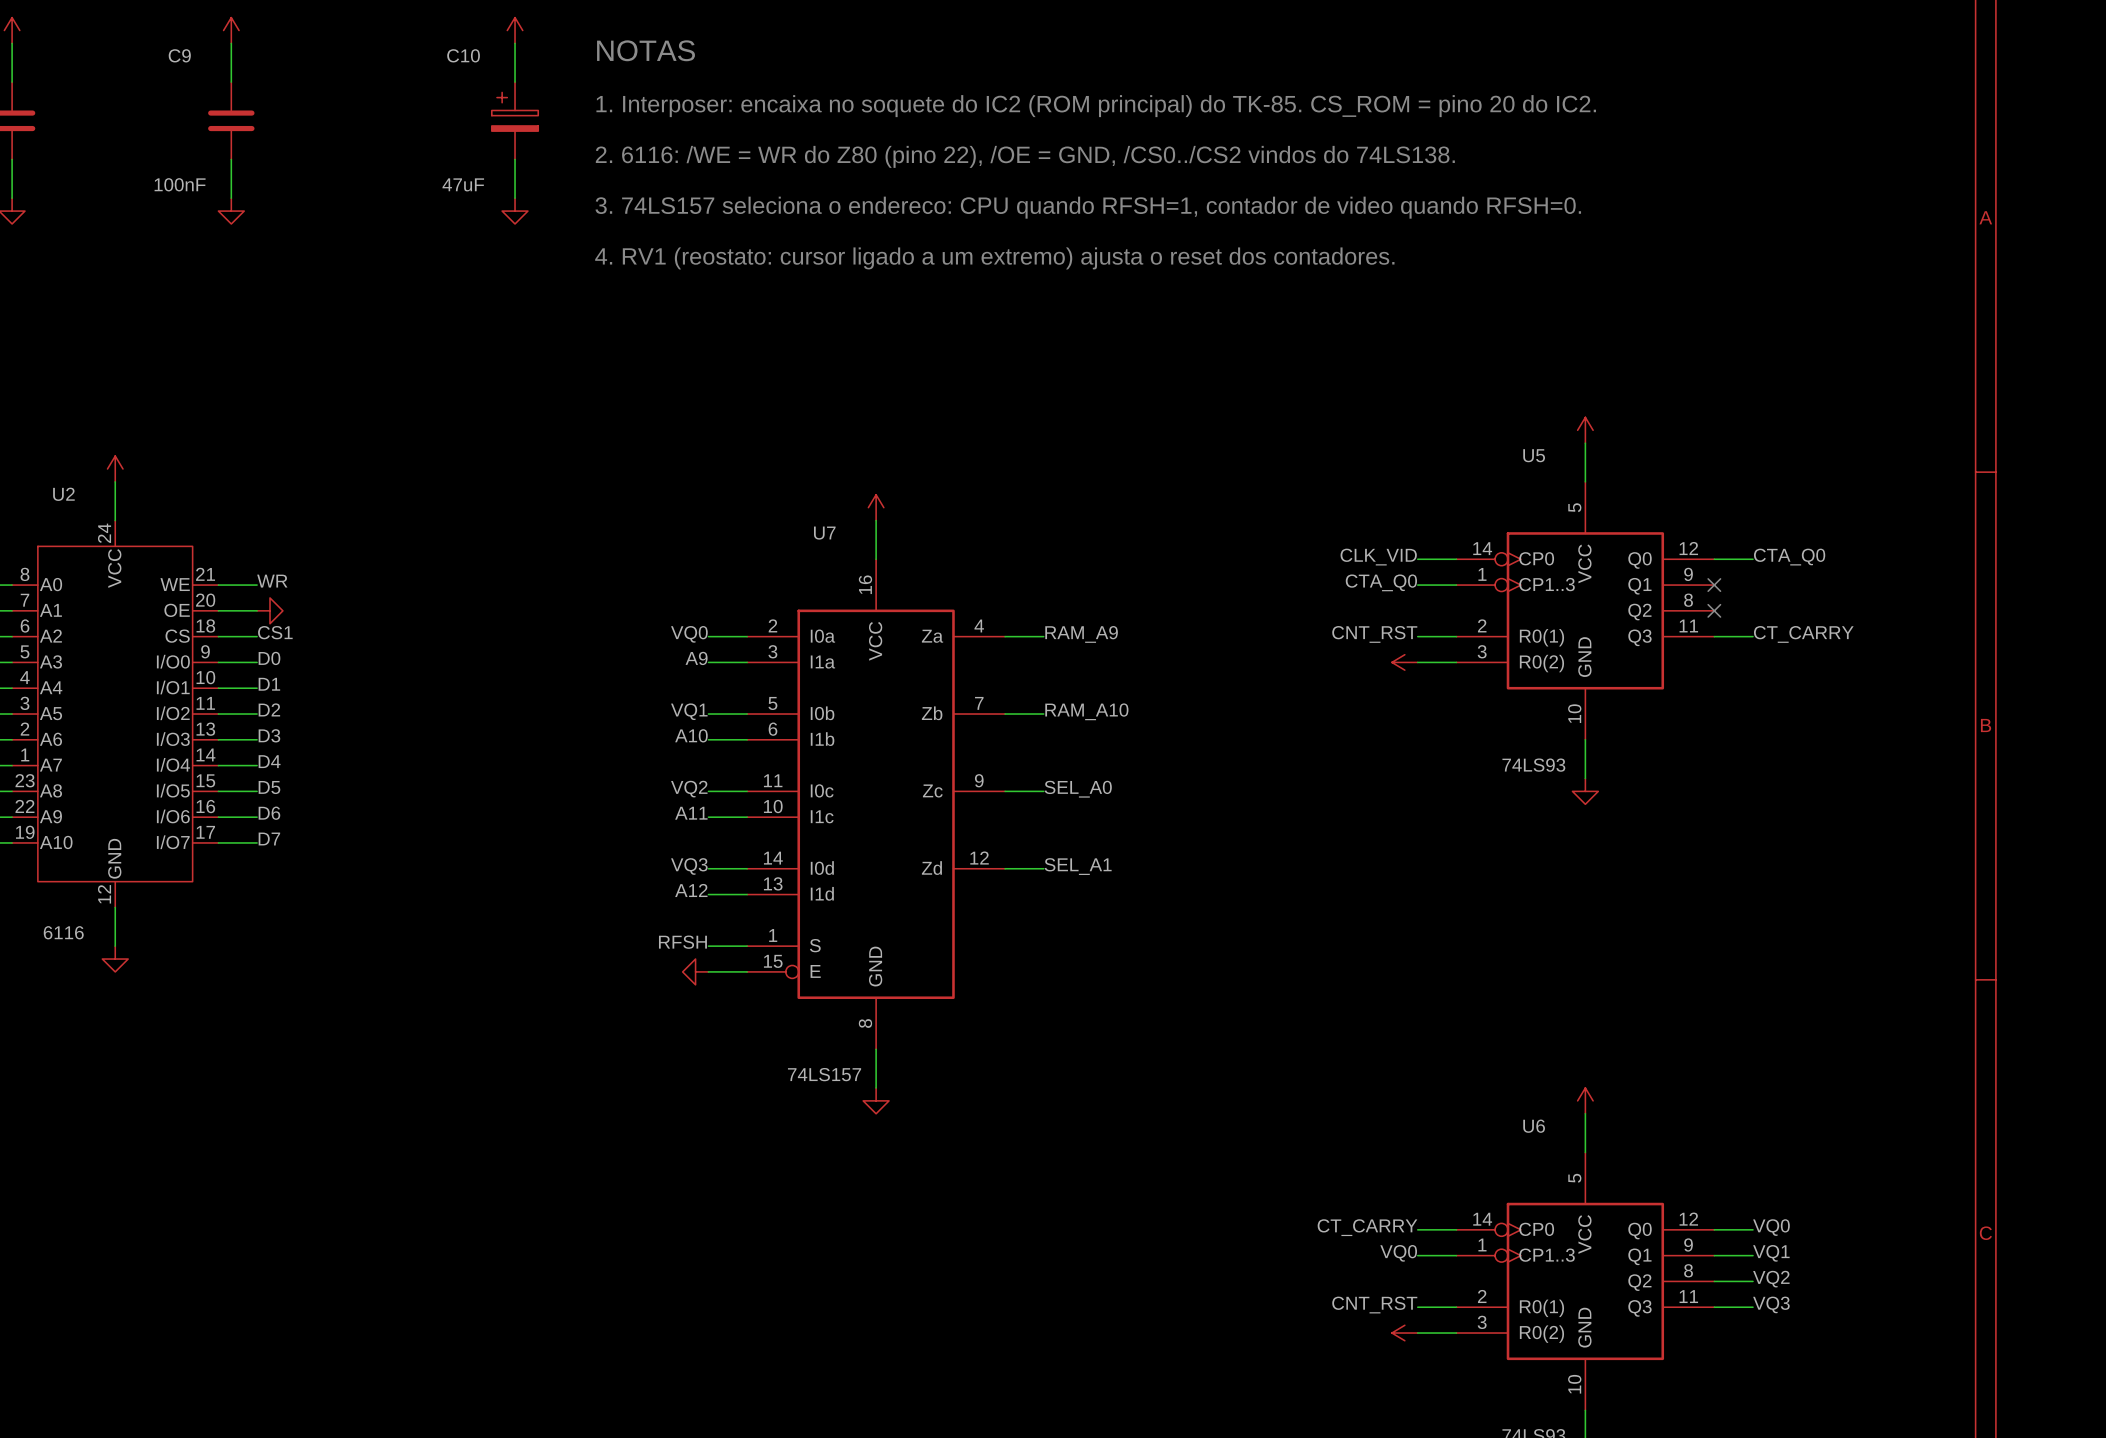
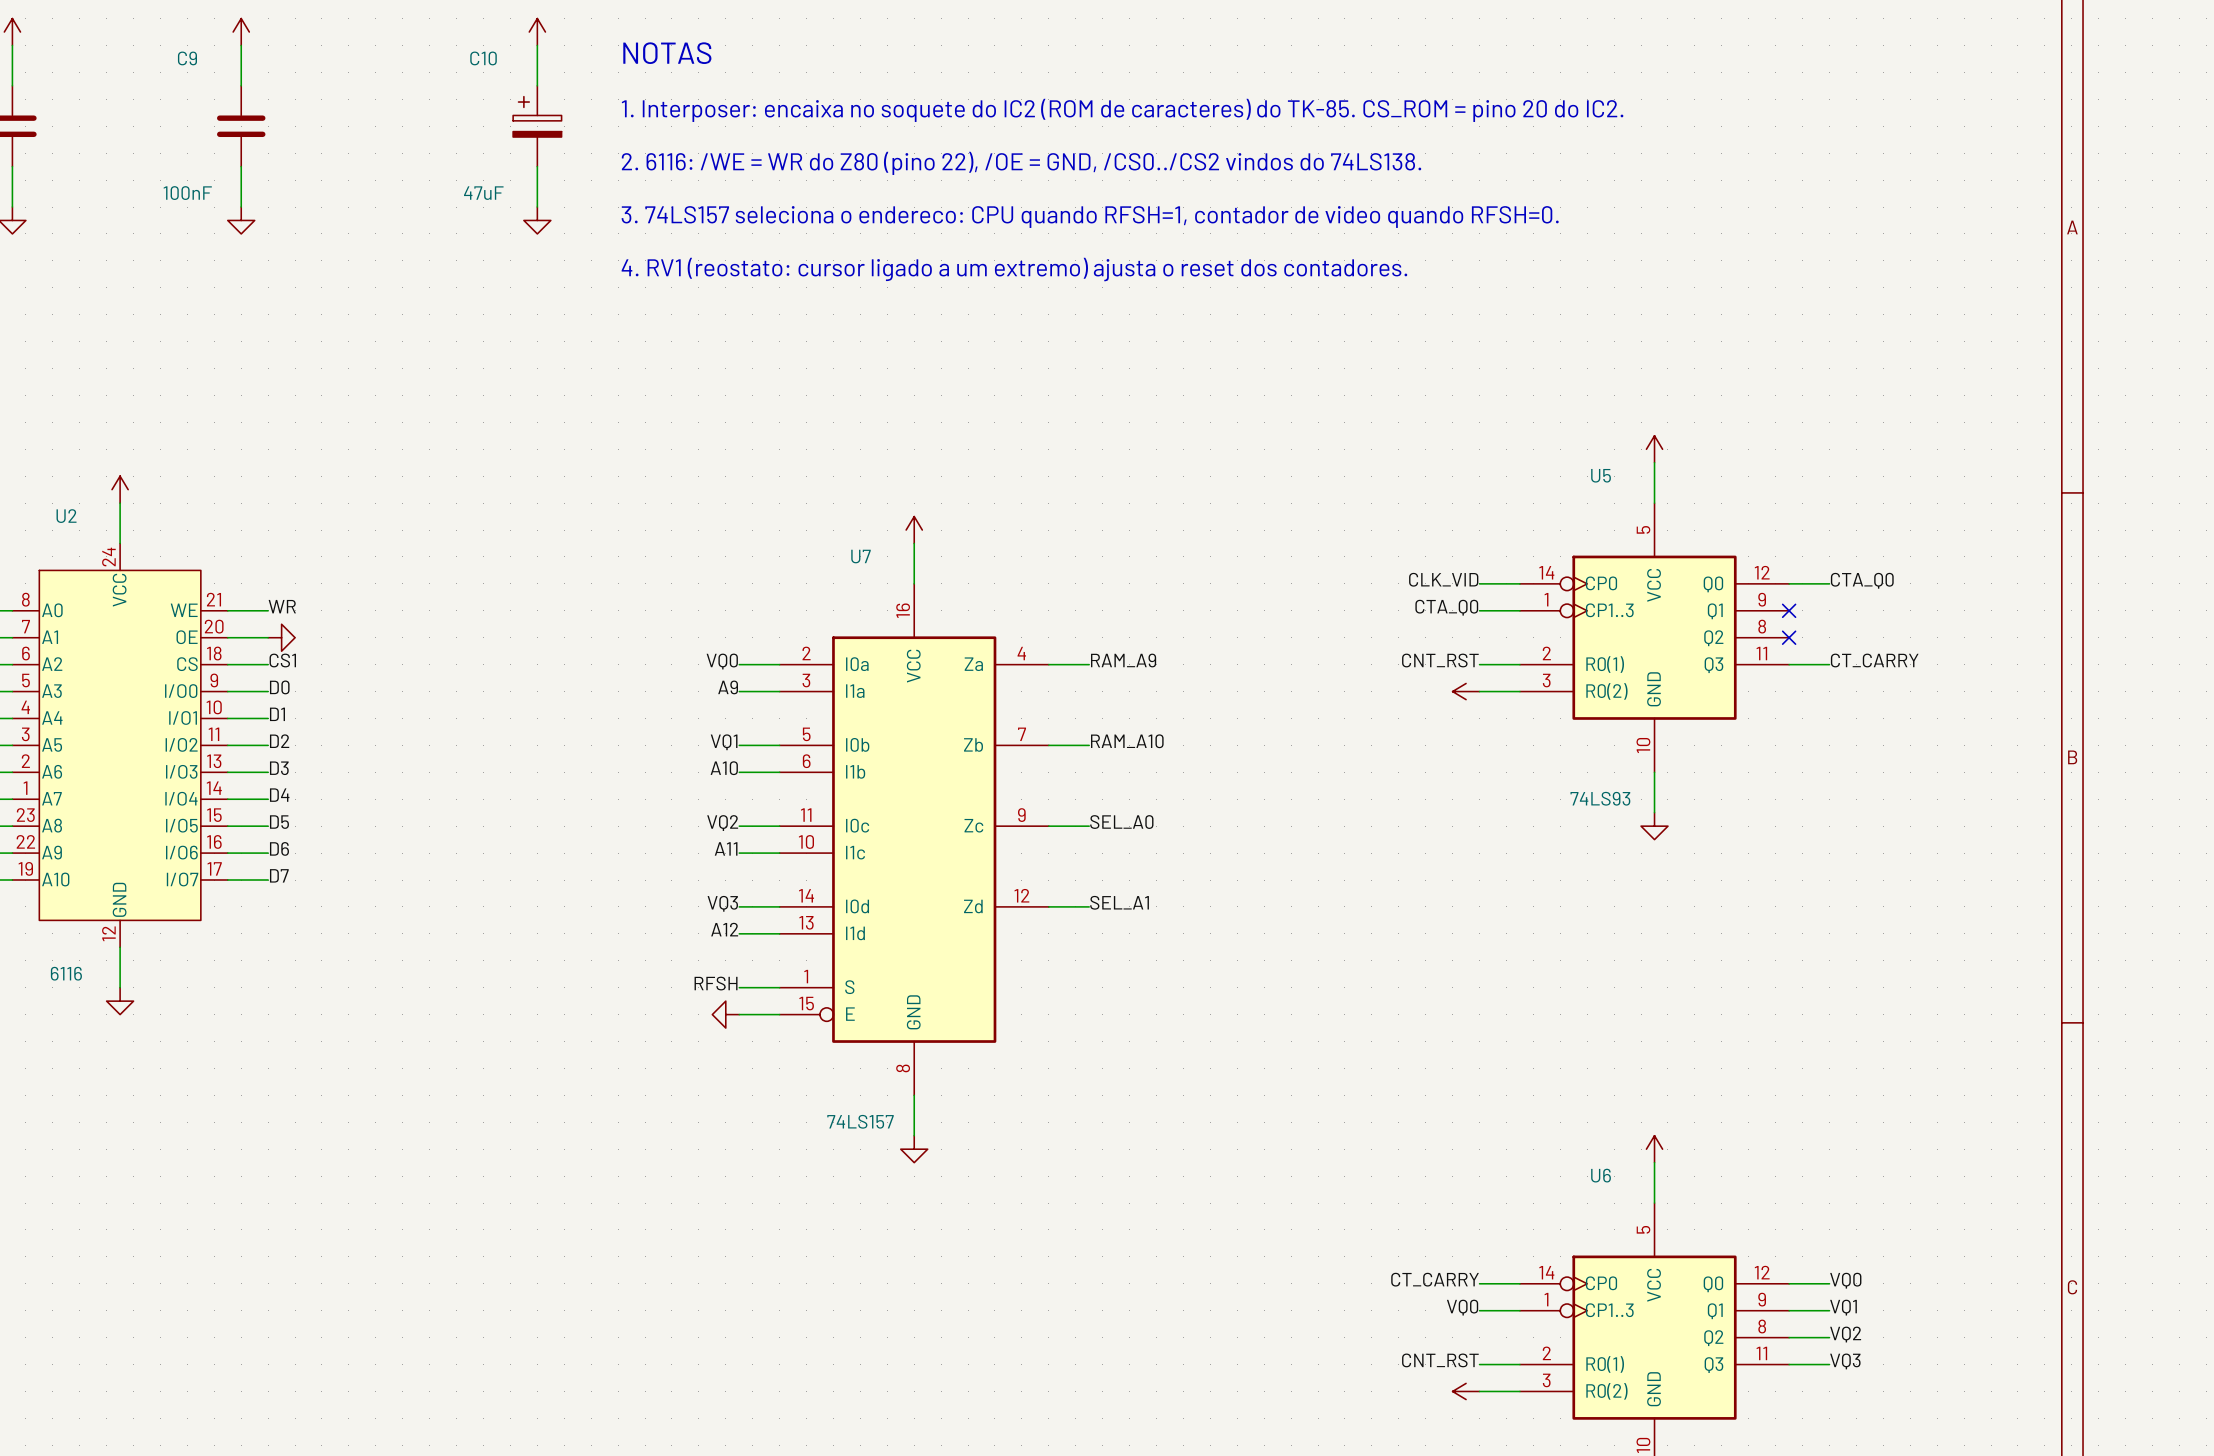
text: 1. Interposer: encaixa no soquete do IC2 (ROM principal) do TK-85. CS_ROM = pino 20 do IC2. (1096, 106) -> 1. Interposer: encaixa no soquete do IC2 (ROM de caracteres) do TK-85. CS_ROM = pino 20 do IC2. (1122, 110)

